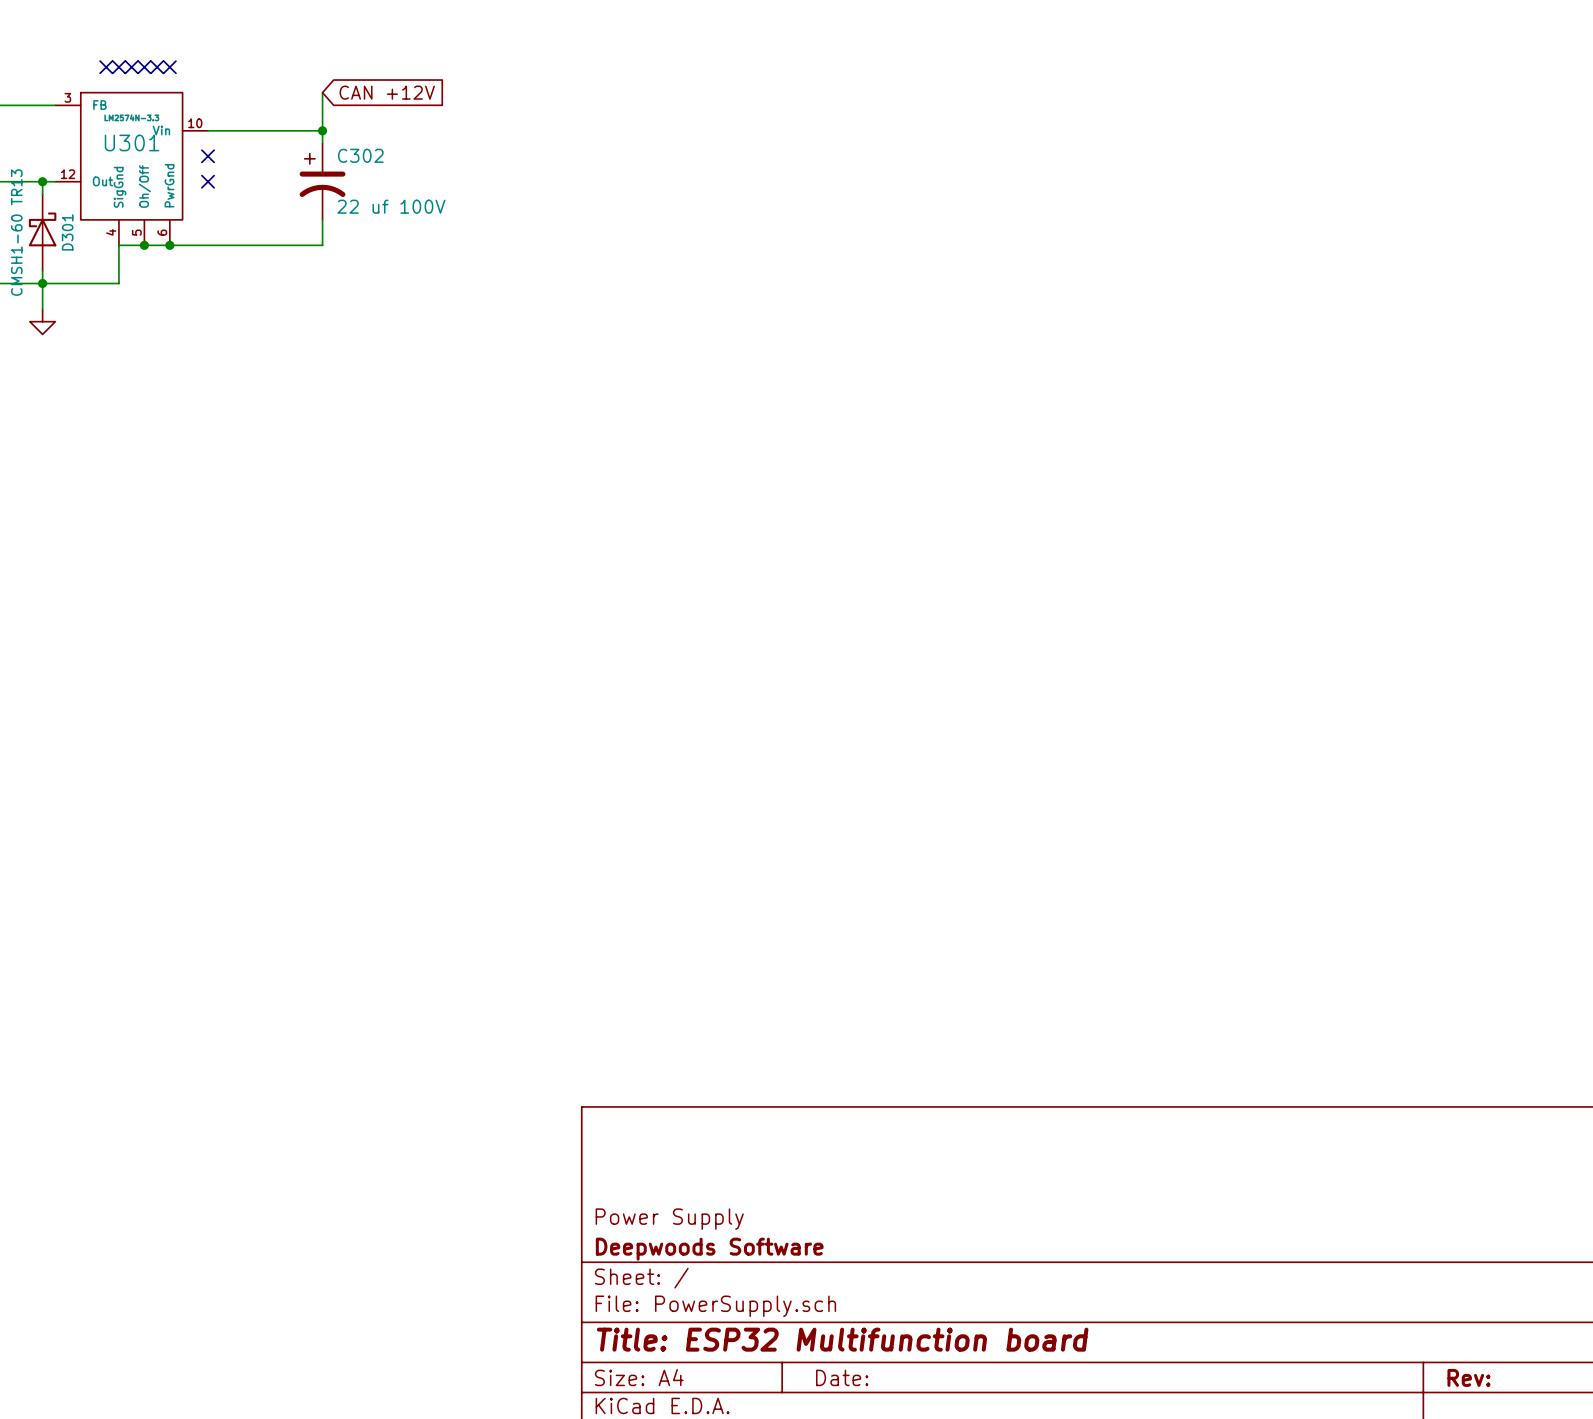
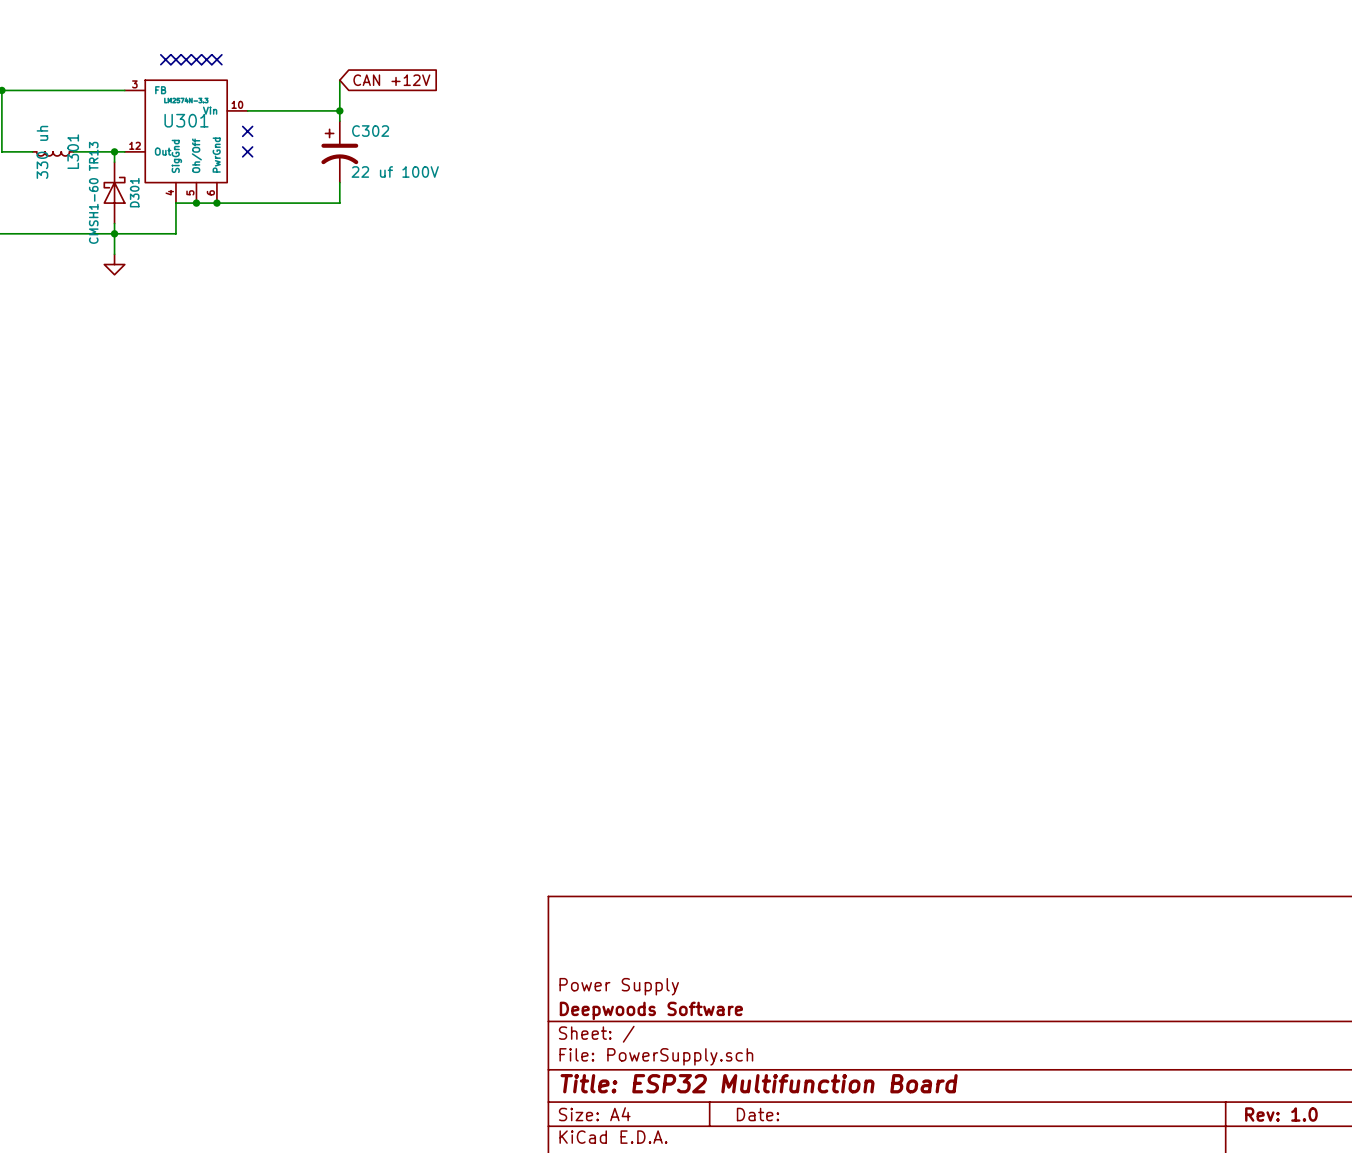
title block: Title: ESP32 Multifunction board (842, 1339) -> Title: ESP32 Multifunction Board (759, 1083)
title block: Rev: (1468, 1377) -> Rev: 1.0 (1281, 1114)

